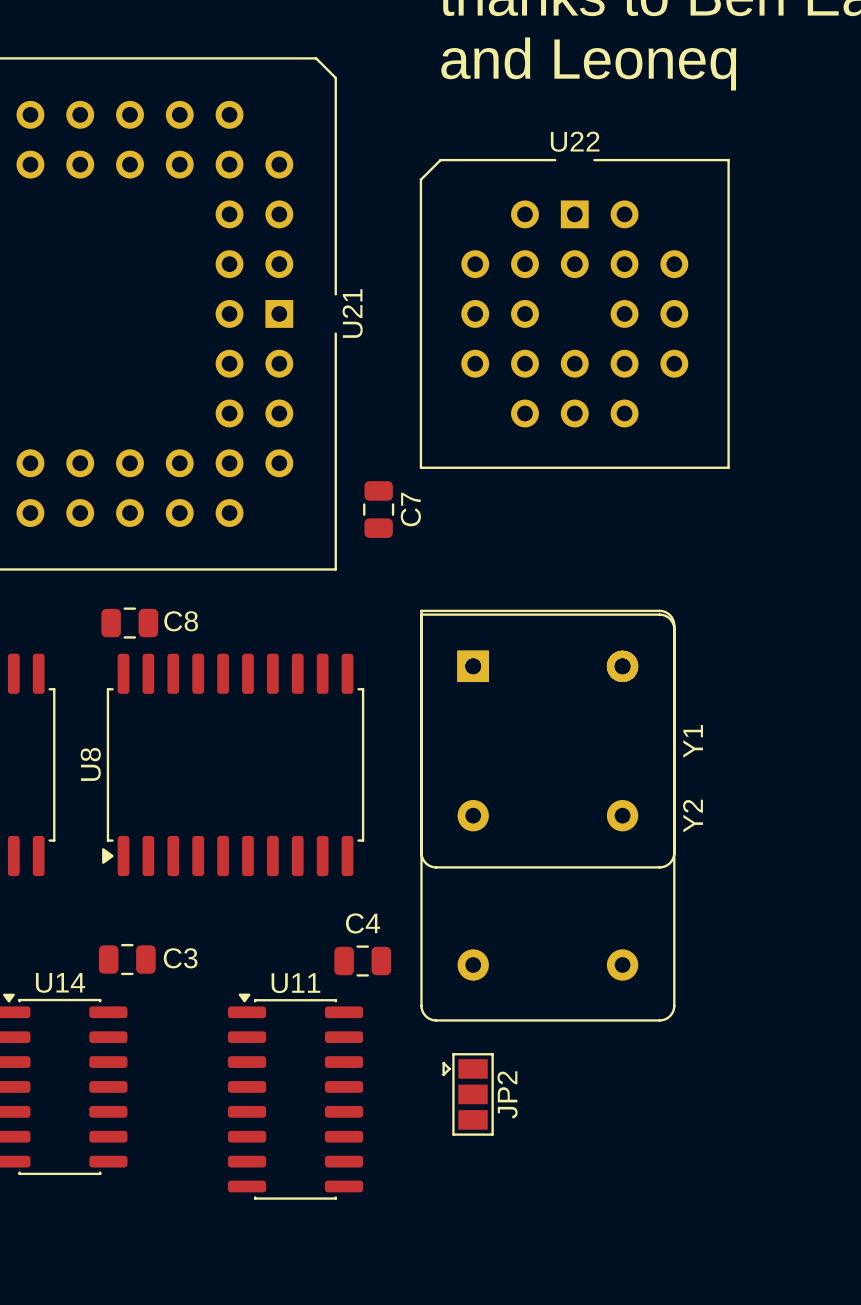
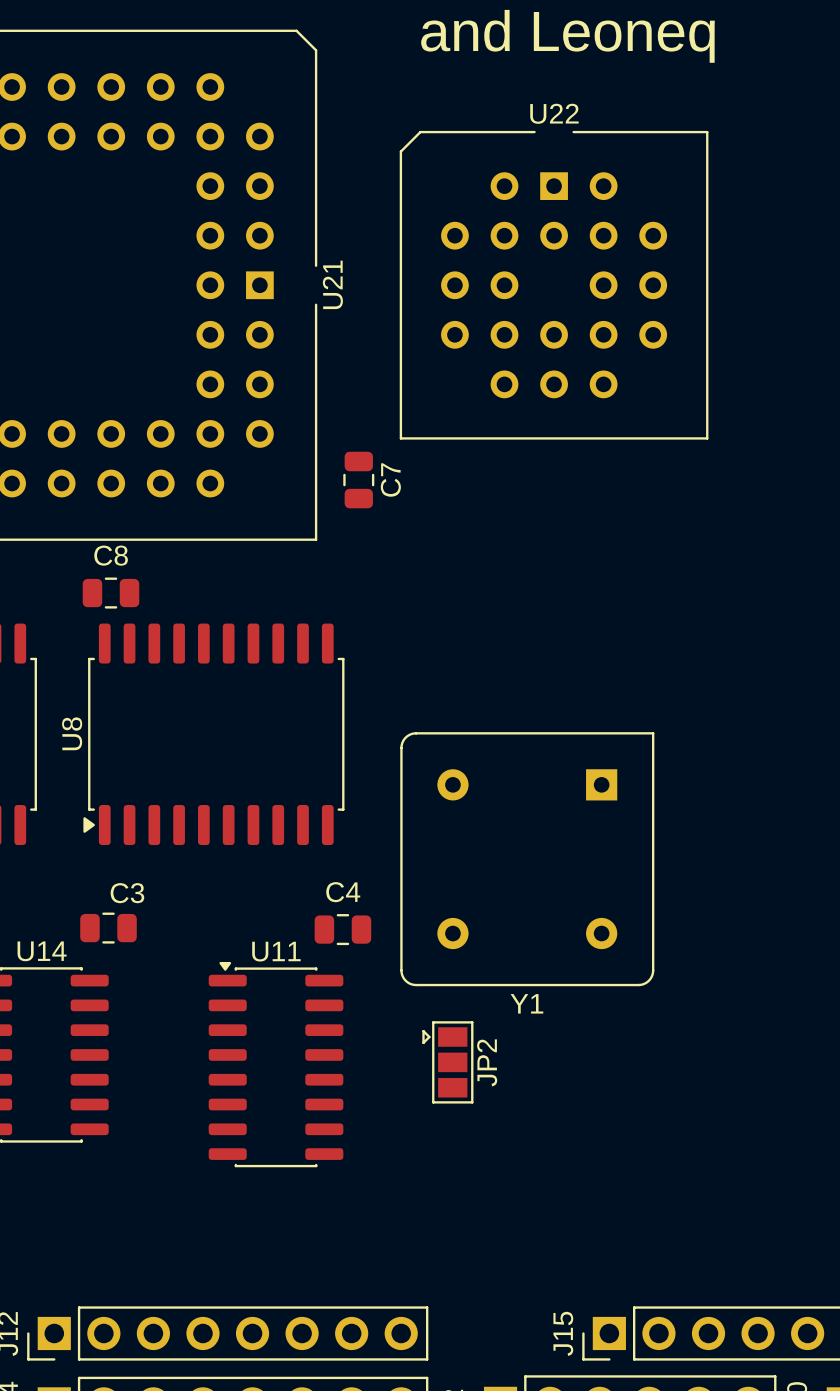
Y1 footprint: [420, 613, 676, 869] -> [400, 732, 655, 987]
C8 name position: C8 (181, 621) -> C8 (111, 555)
Y1 name position: Y1 (693, 741) -> Y1 (526, 1003)
Y2: (547, 815) -> none
C3 name position: C3 (180, 958) -> C3 (127, 893)

